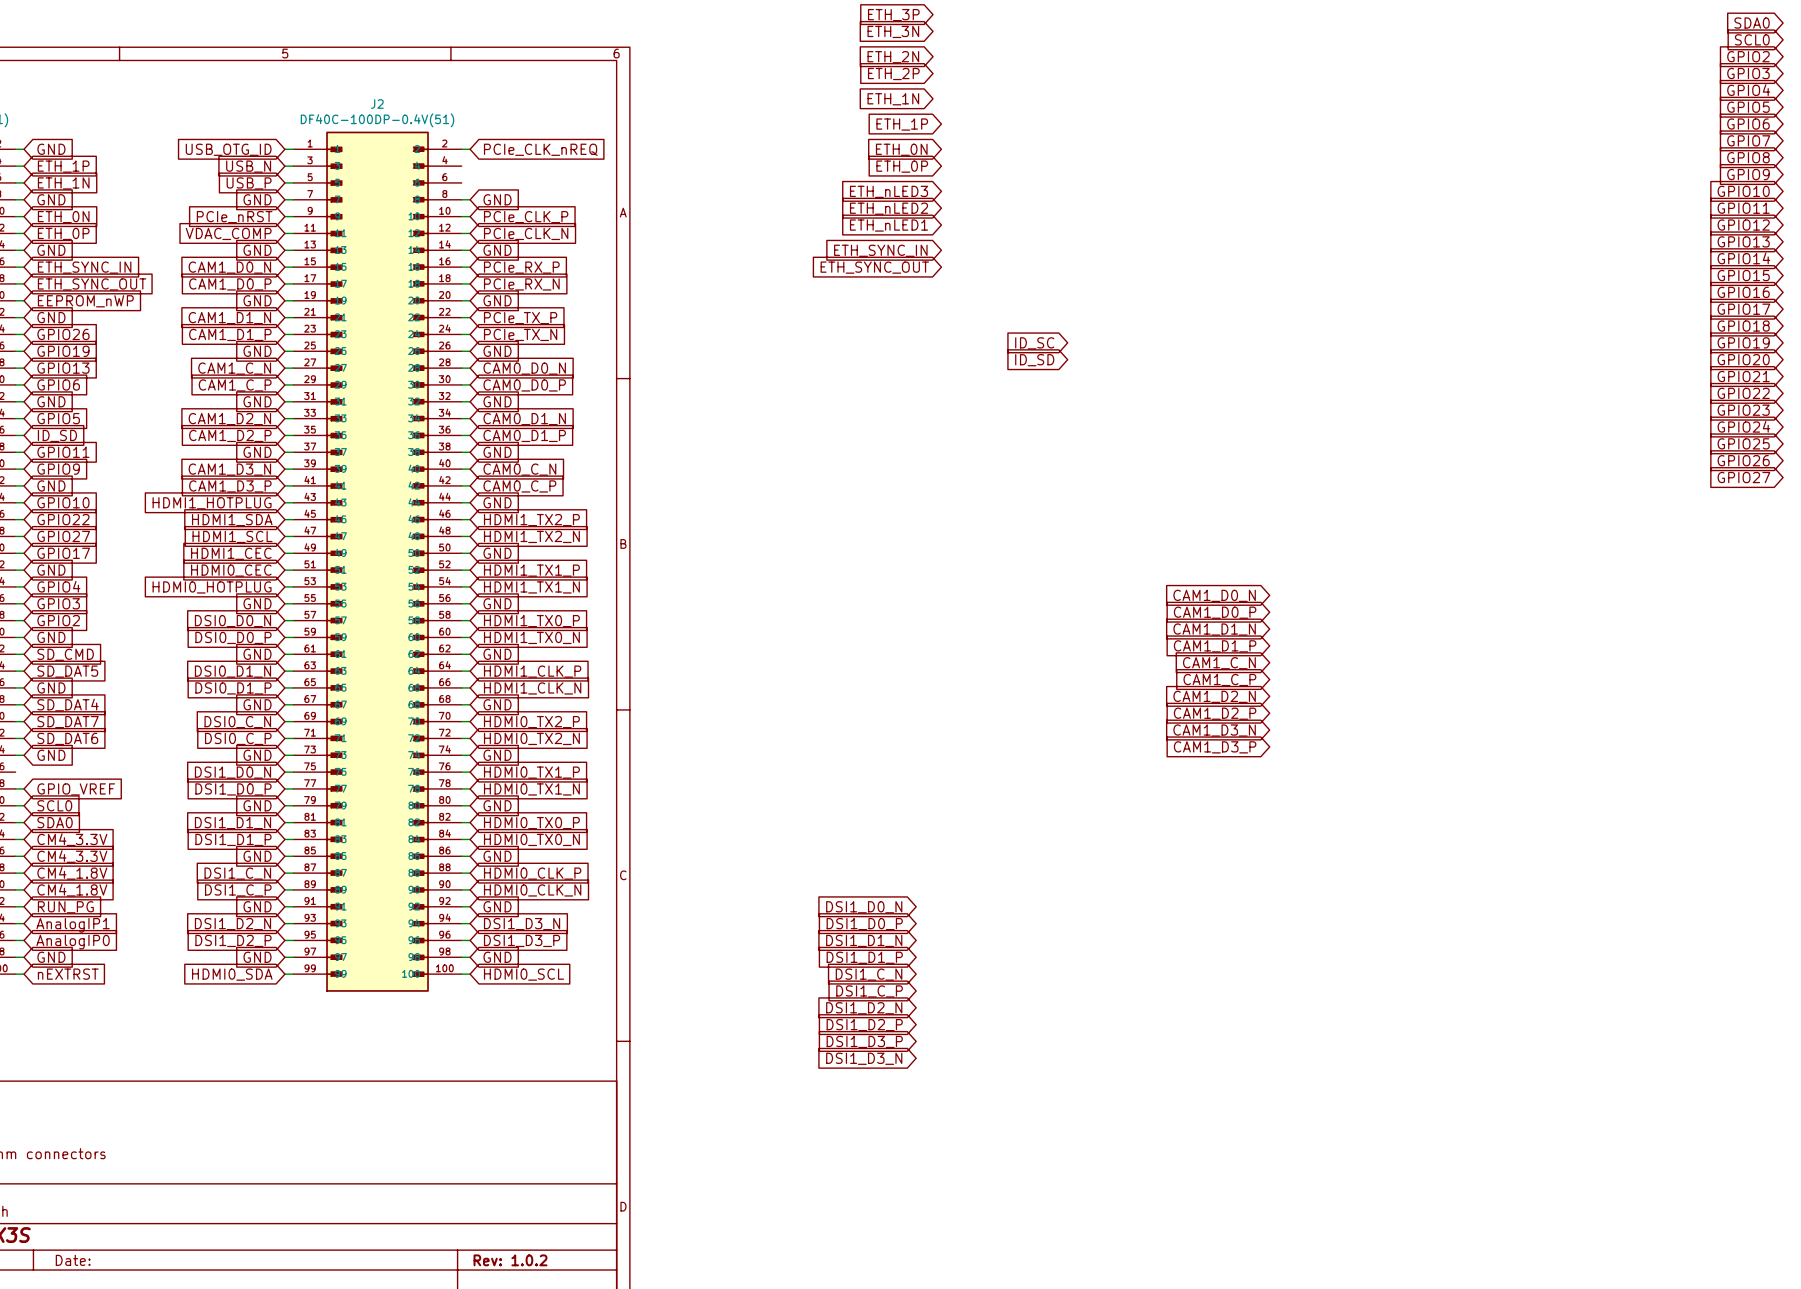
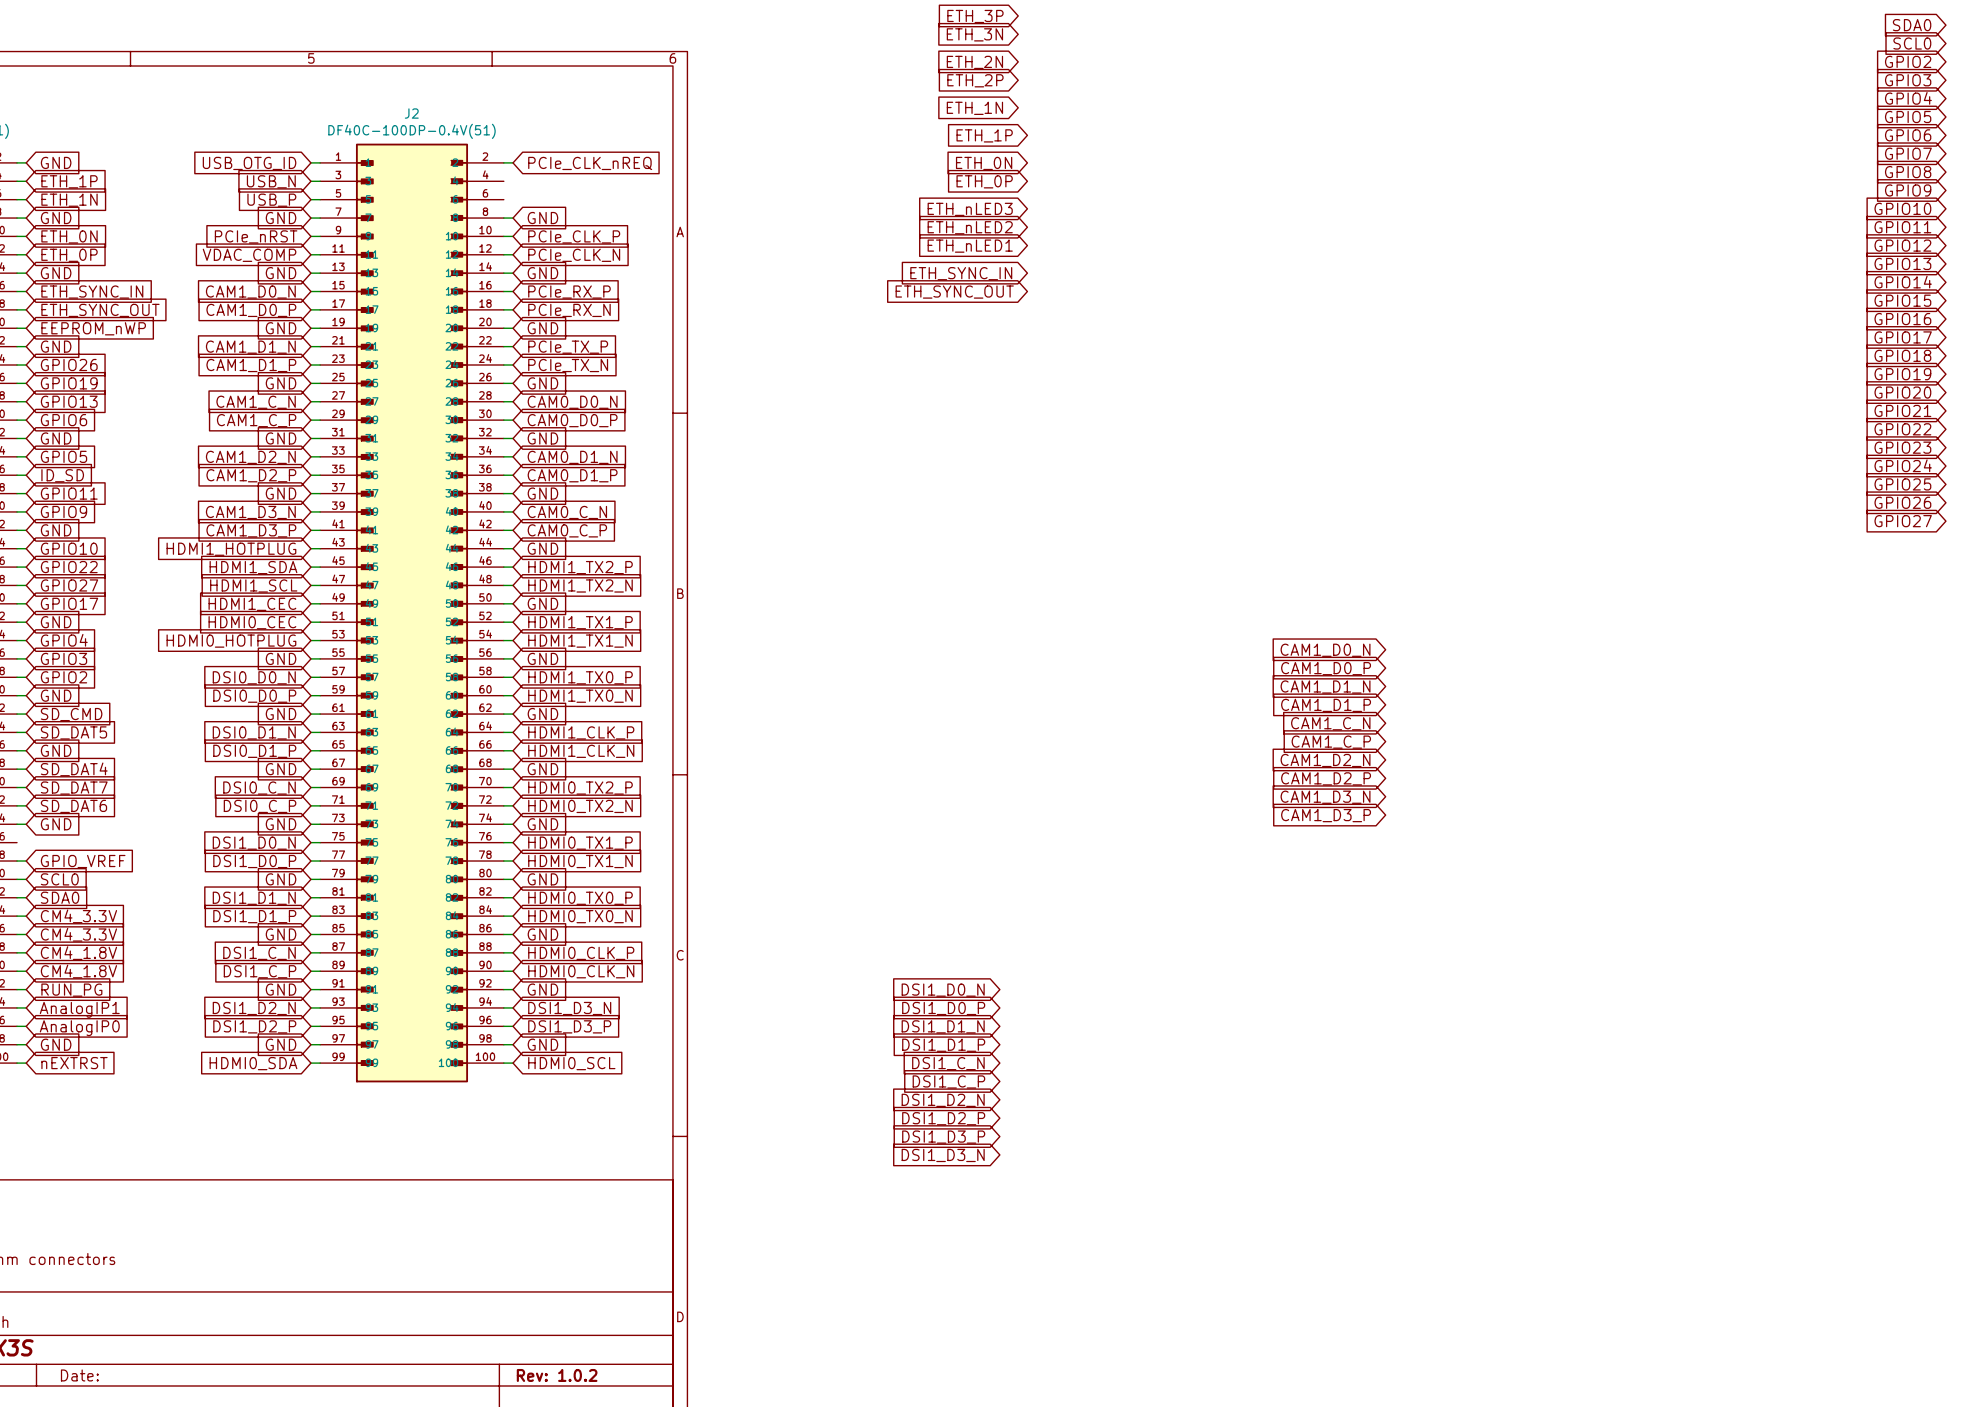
global label: ID_SC (1034, 343) -> none
global label: ID_SD (1034, 360) -> none

